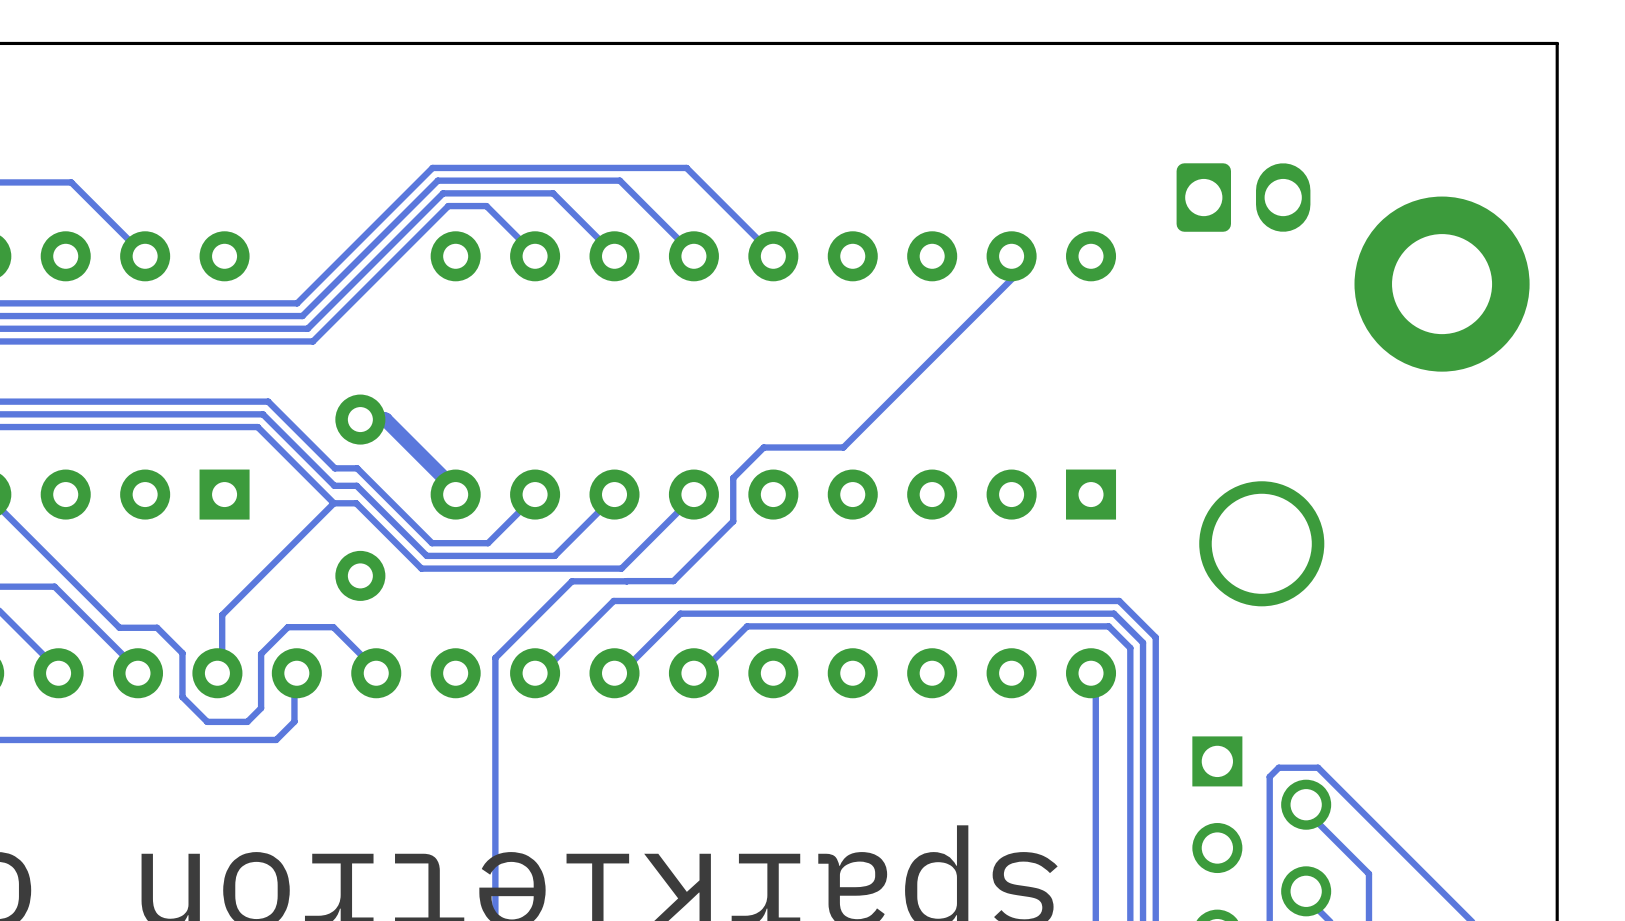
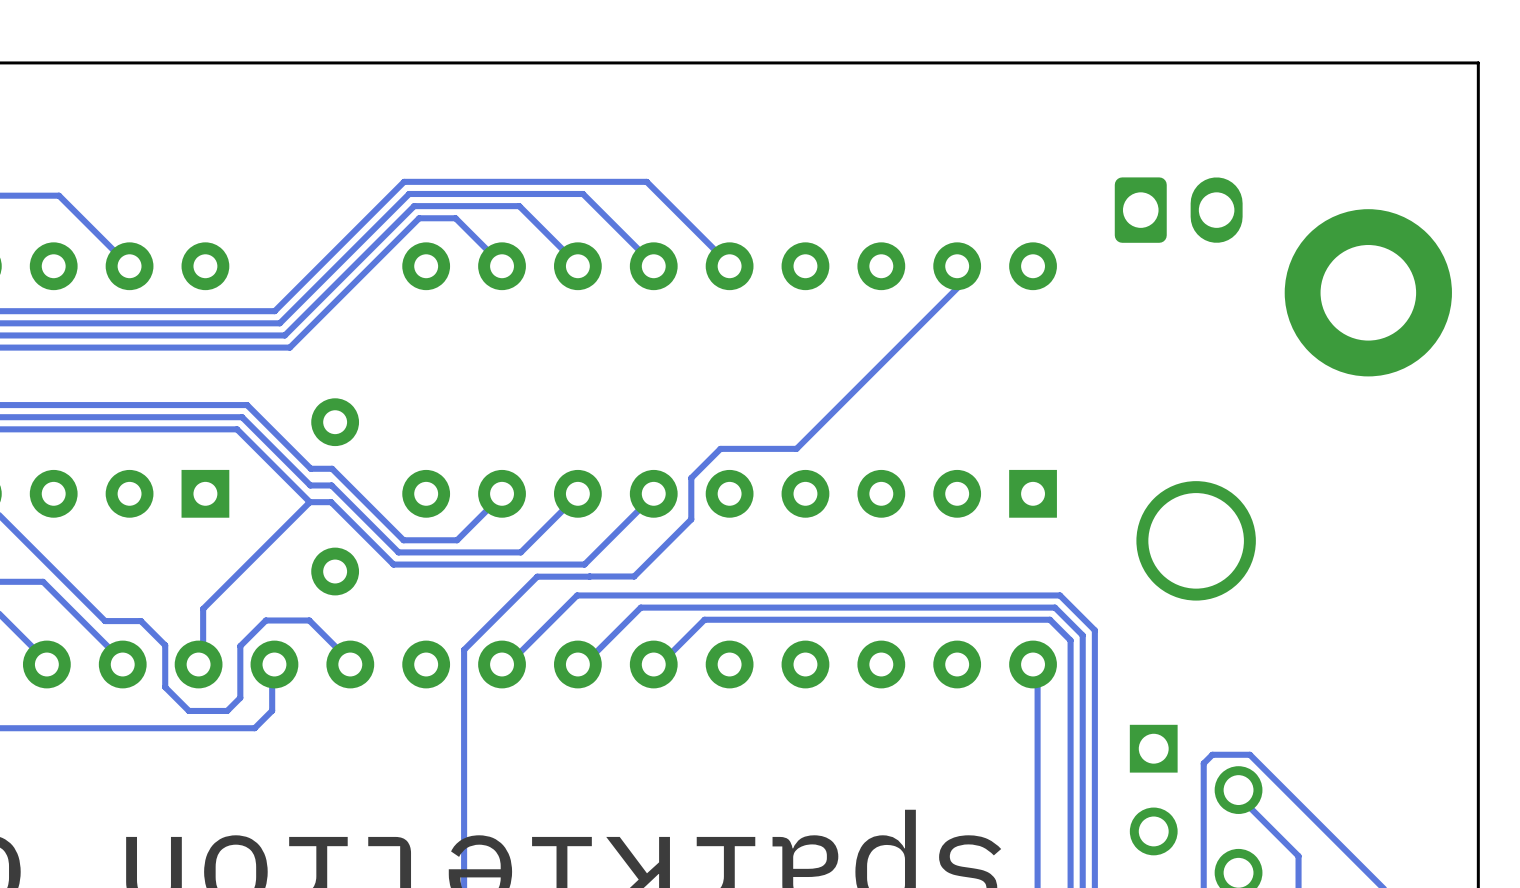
track: (352, 421) (354, 419) (385, 419) (460, 494) -> none

